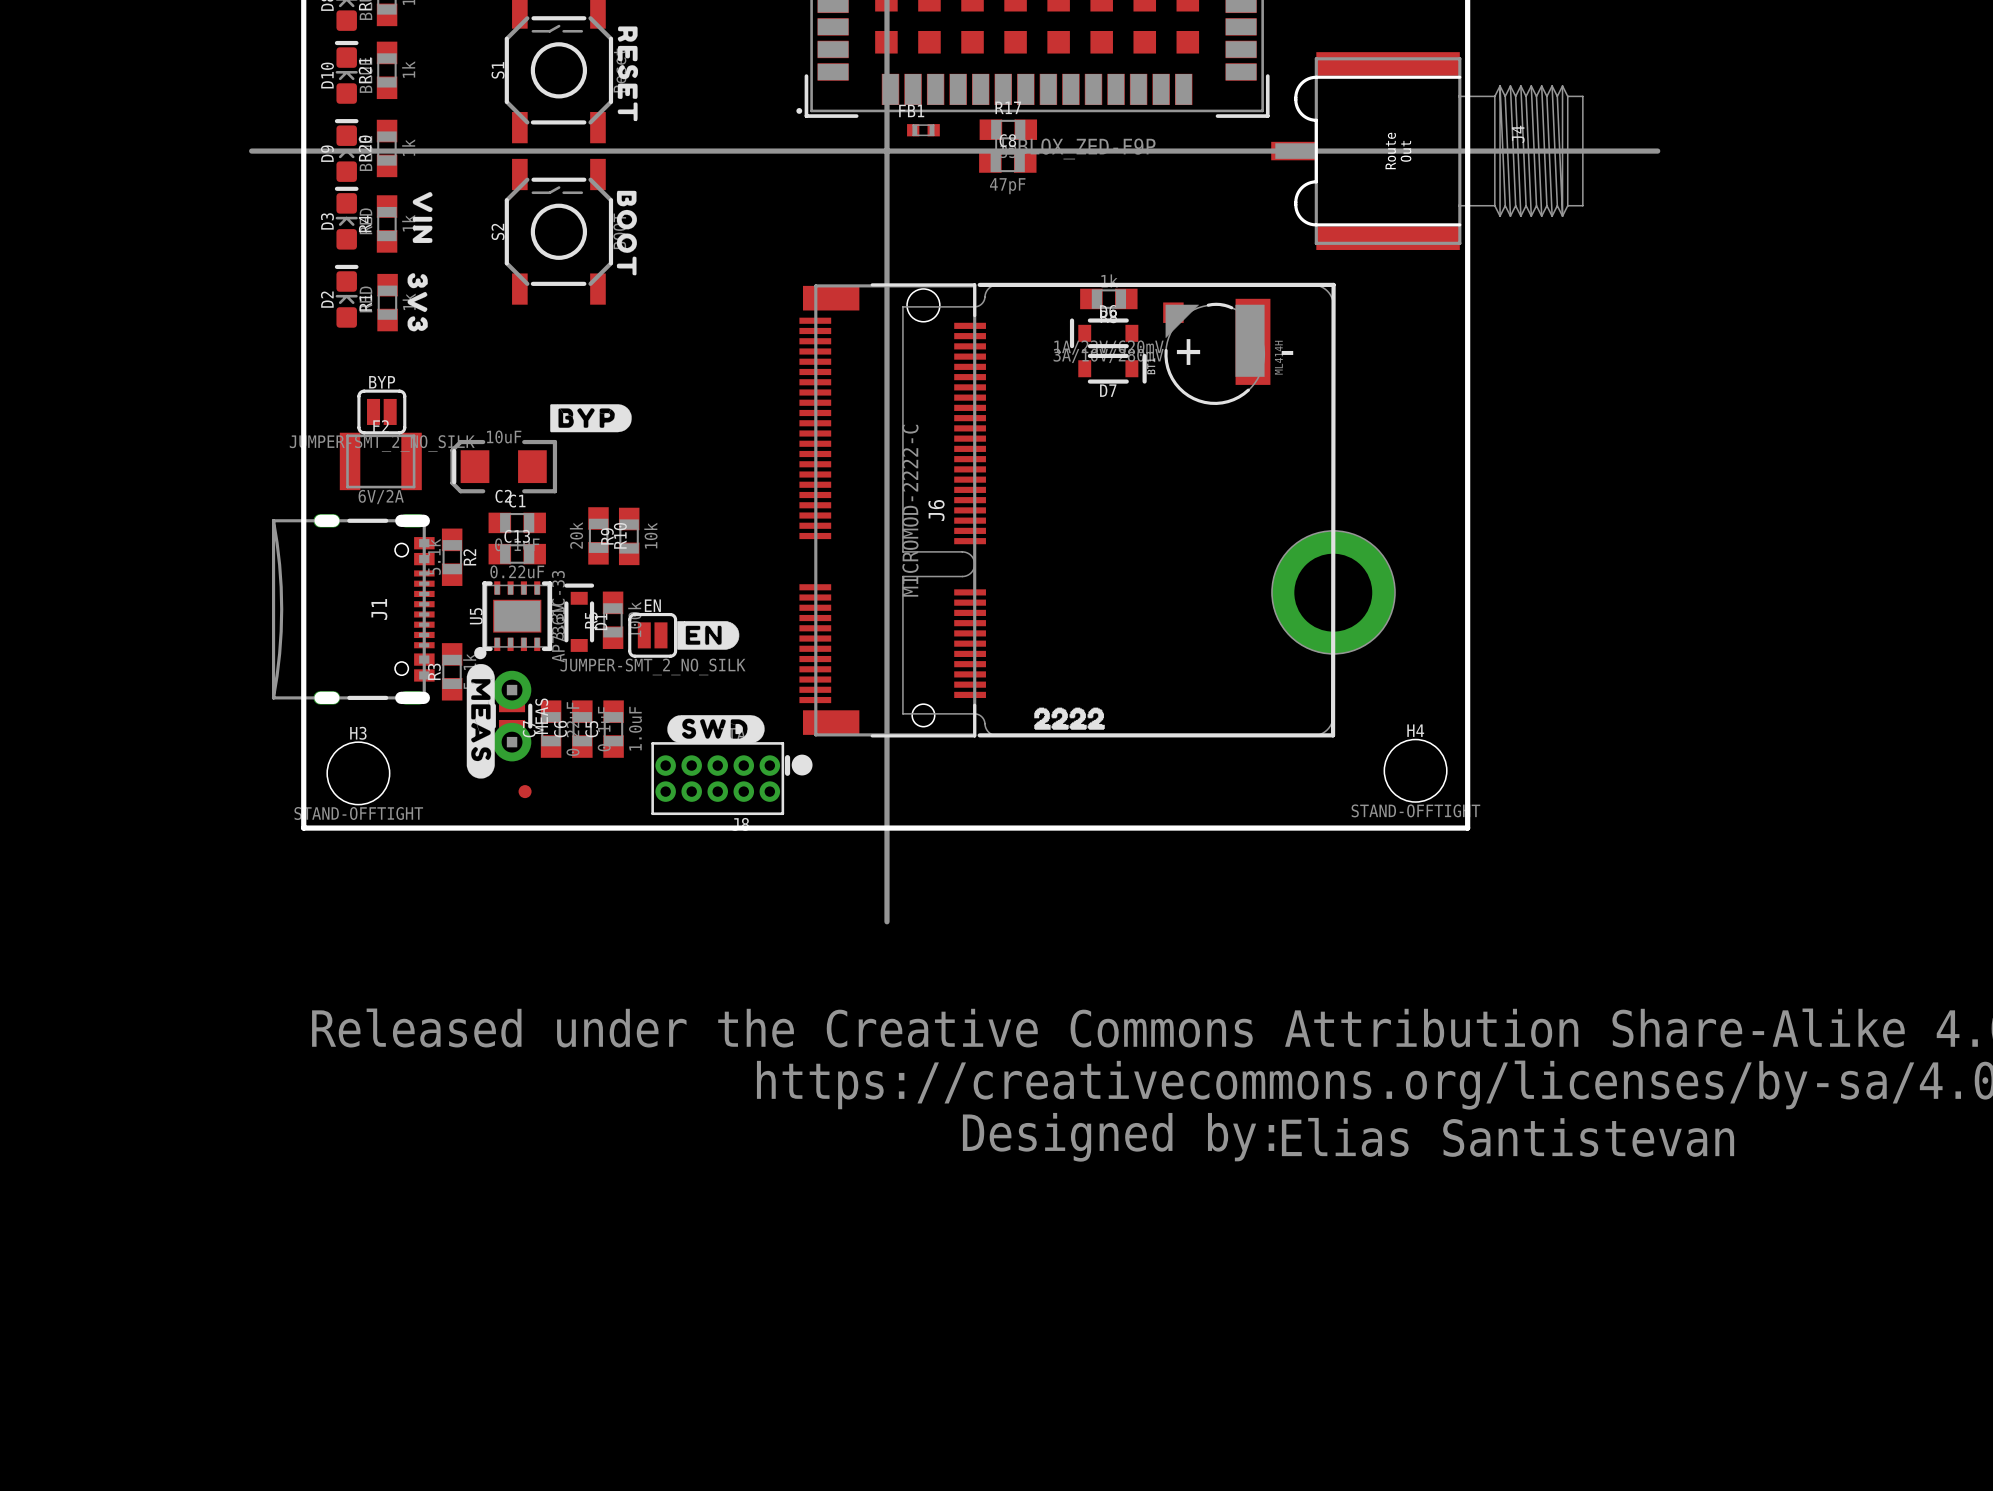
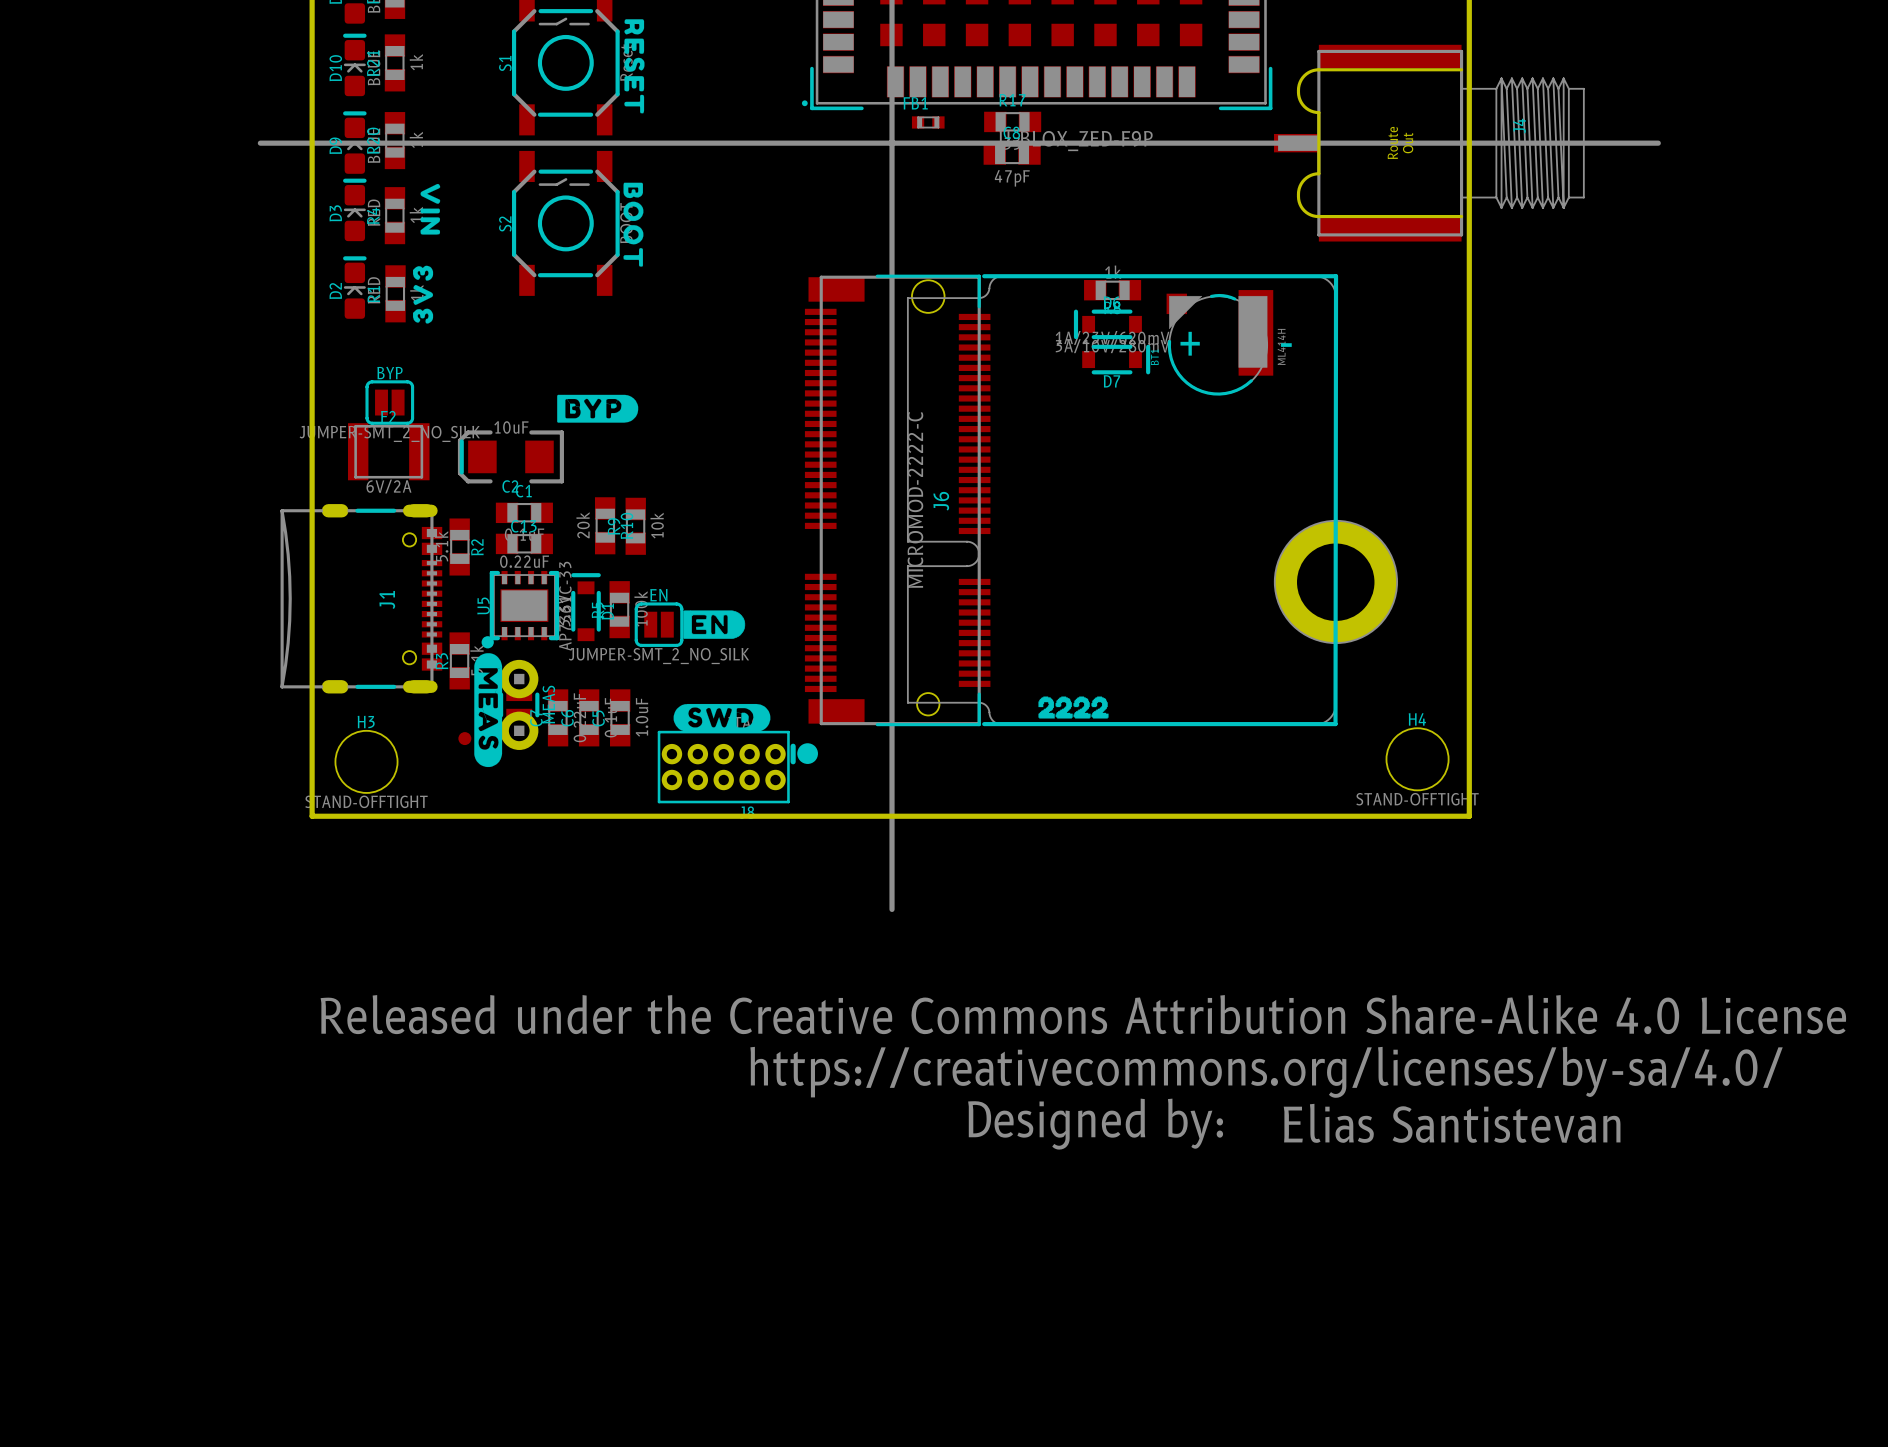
drawing shape: [407, 273, 428, 332] -> [413, 265, 434, 324]
part position: (525, 791) -> (464, 738)

